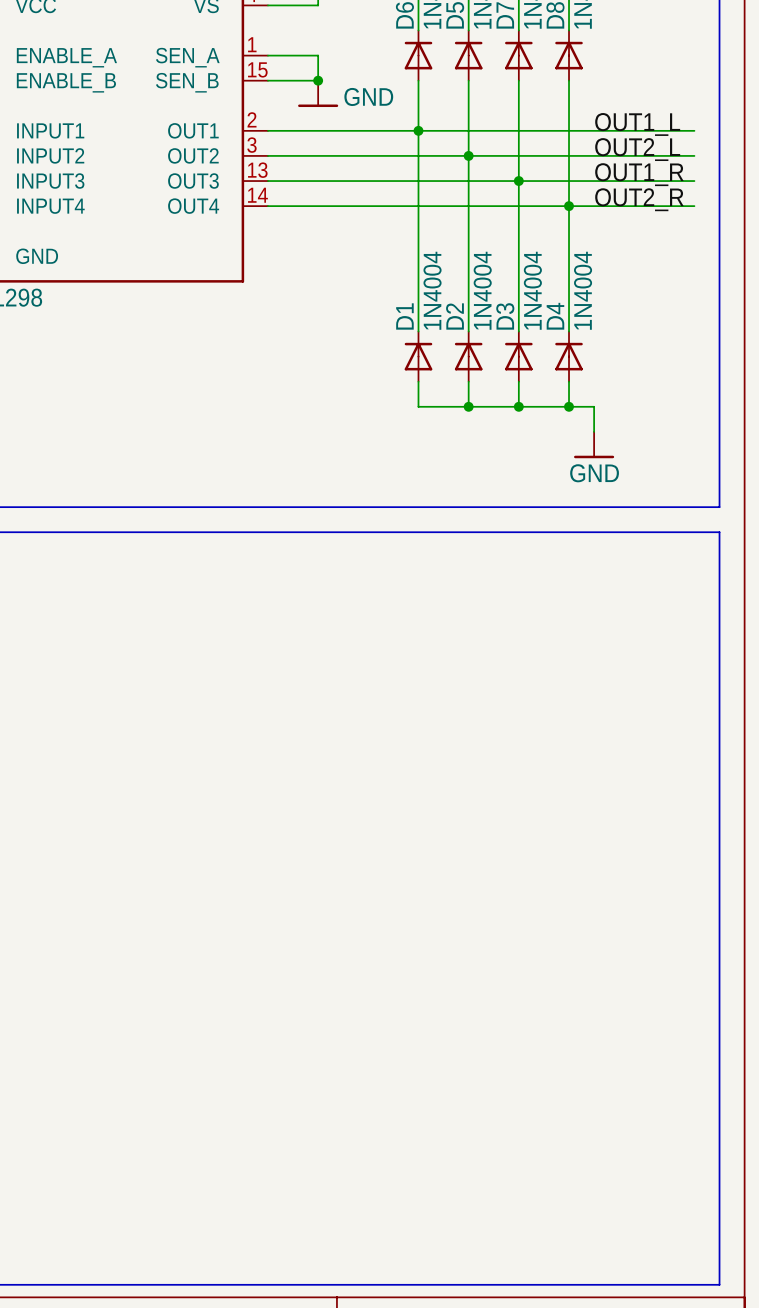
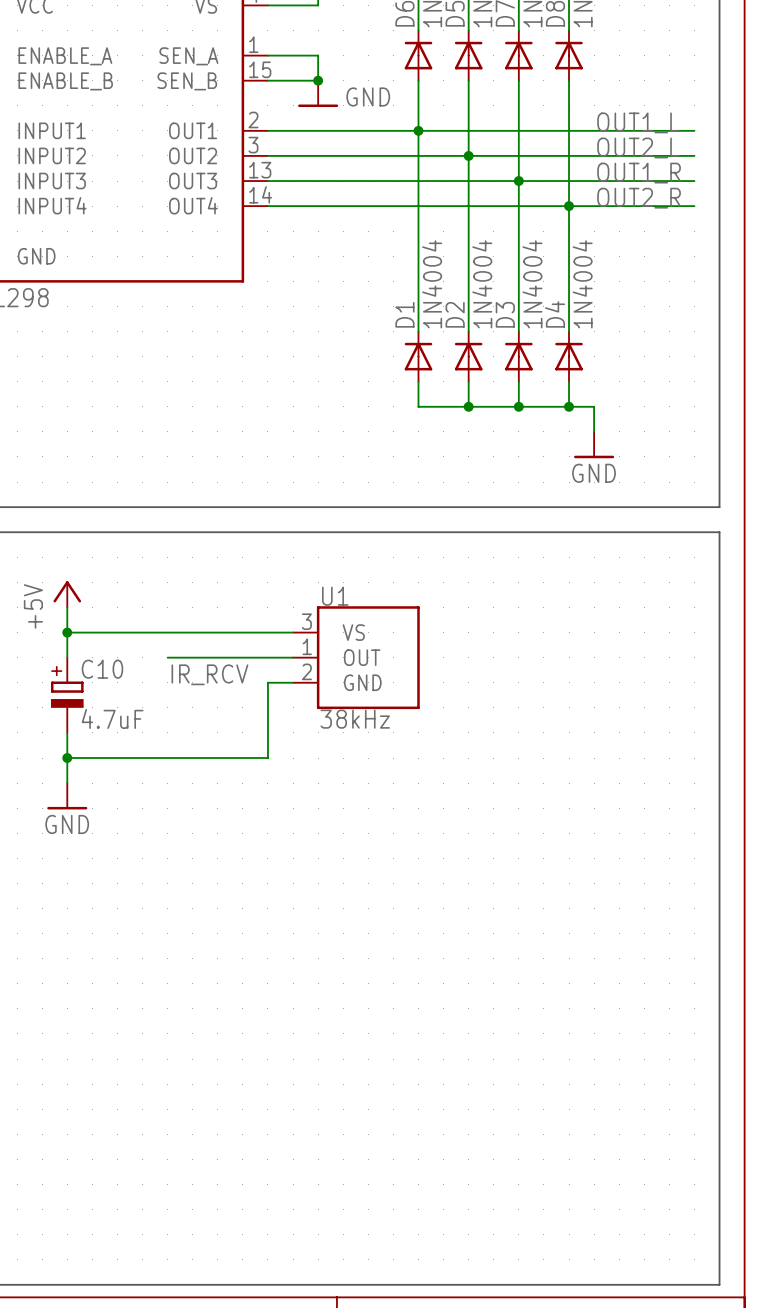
power symbol: none -> +5V (67, 594)
wire: none -> (67, 607) (67, 657)
wire: none -> (67, 632) (293, 632)
junction: none -> (67, 632)
wire: none -> (167, 657) (293, 657)
U1: none -> 38kHz (356, 657)
label: none -> IR_RCV (209, 674)
wire: none -> (293, 682) (267, 682) (267, 758) (67, 758)
C10: none -> 4.7uF (67, 695)
wire: none -> (67, 732) (67, 783)
junction: none -> (67, 758)
power symbol: none -> GND (67, 796)

